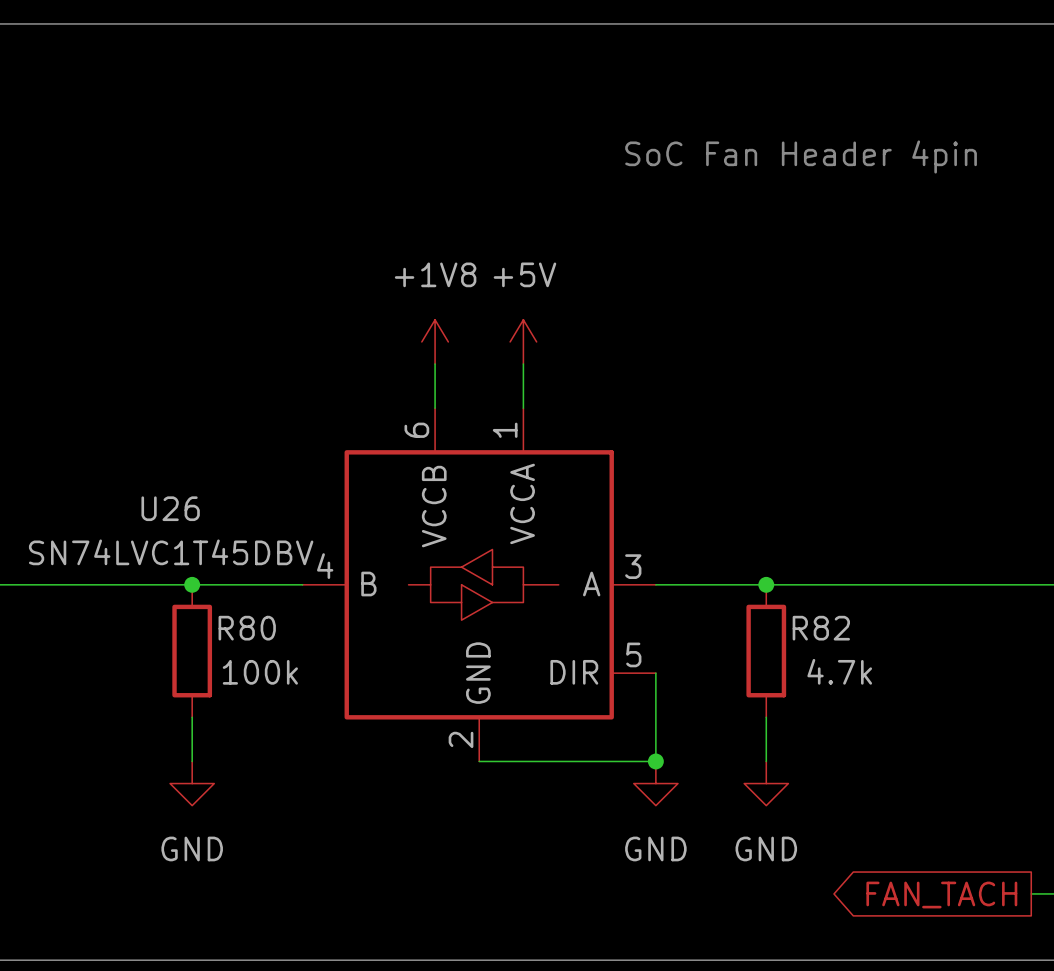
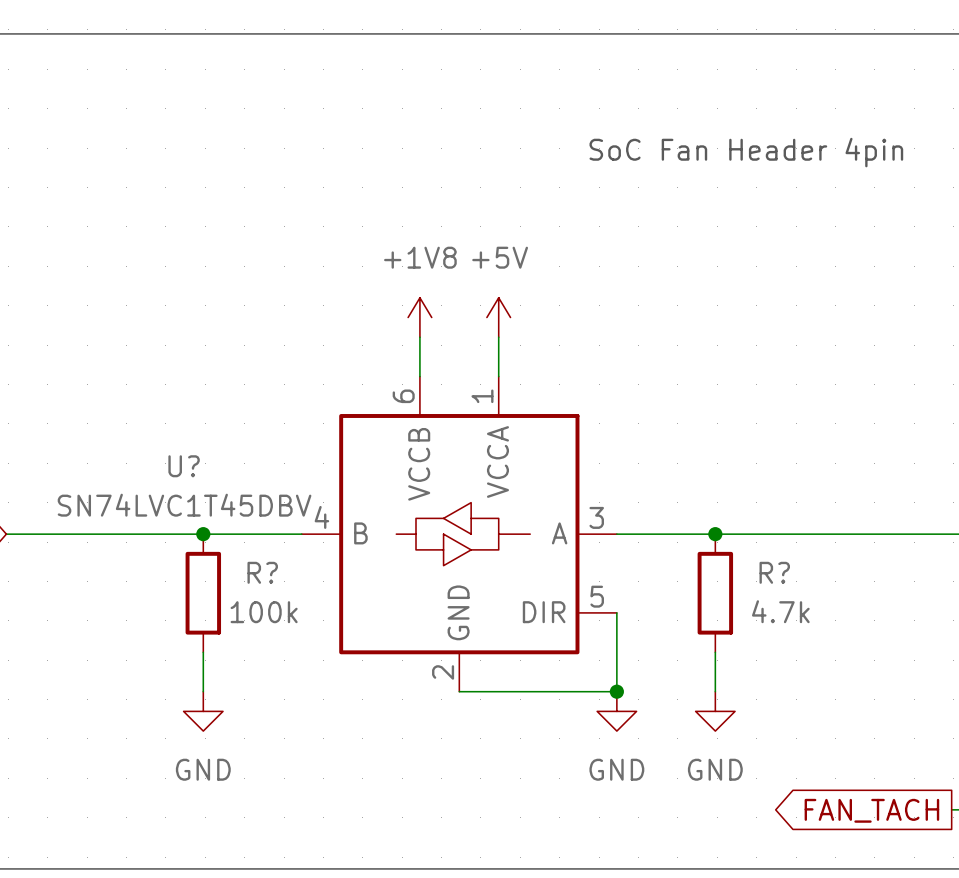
U26 name: U26 (170, 508) -> U? (184, 466)
R80 name: R80 (247, 628) -> R? (262, 572)
R82 name: R82 (821, 628) -> R? (774, 572)

